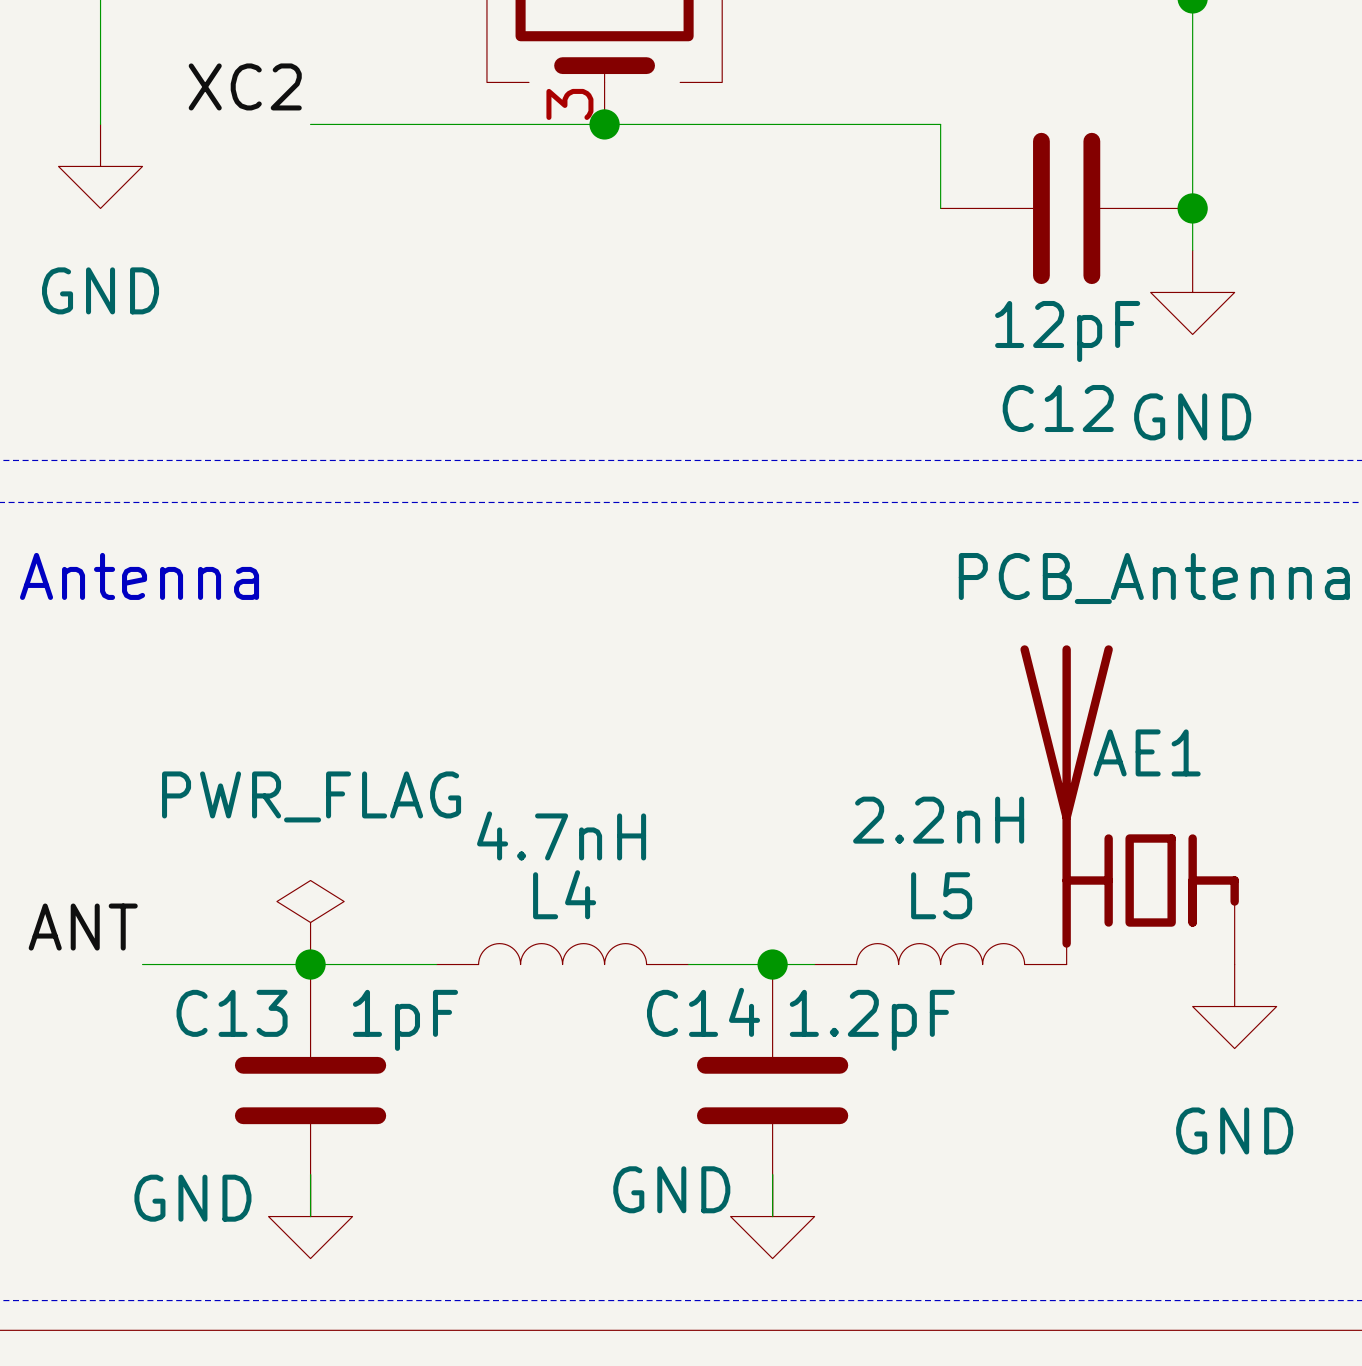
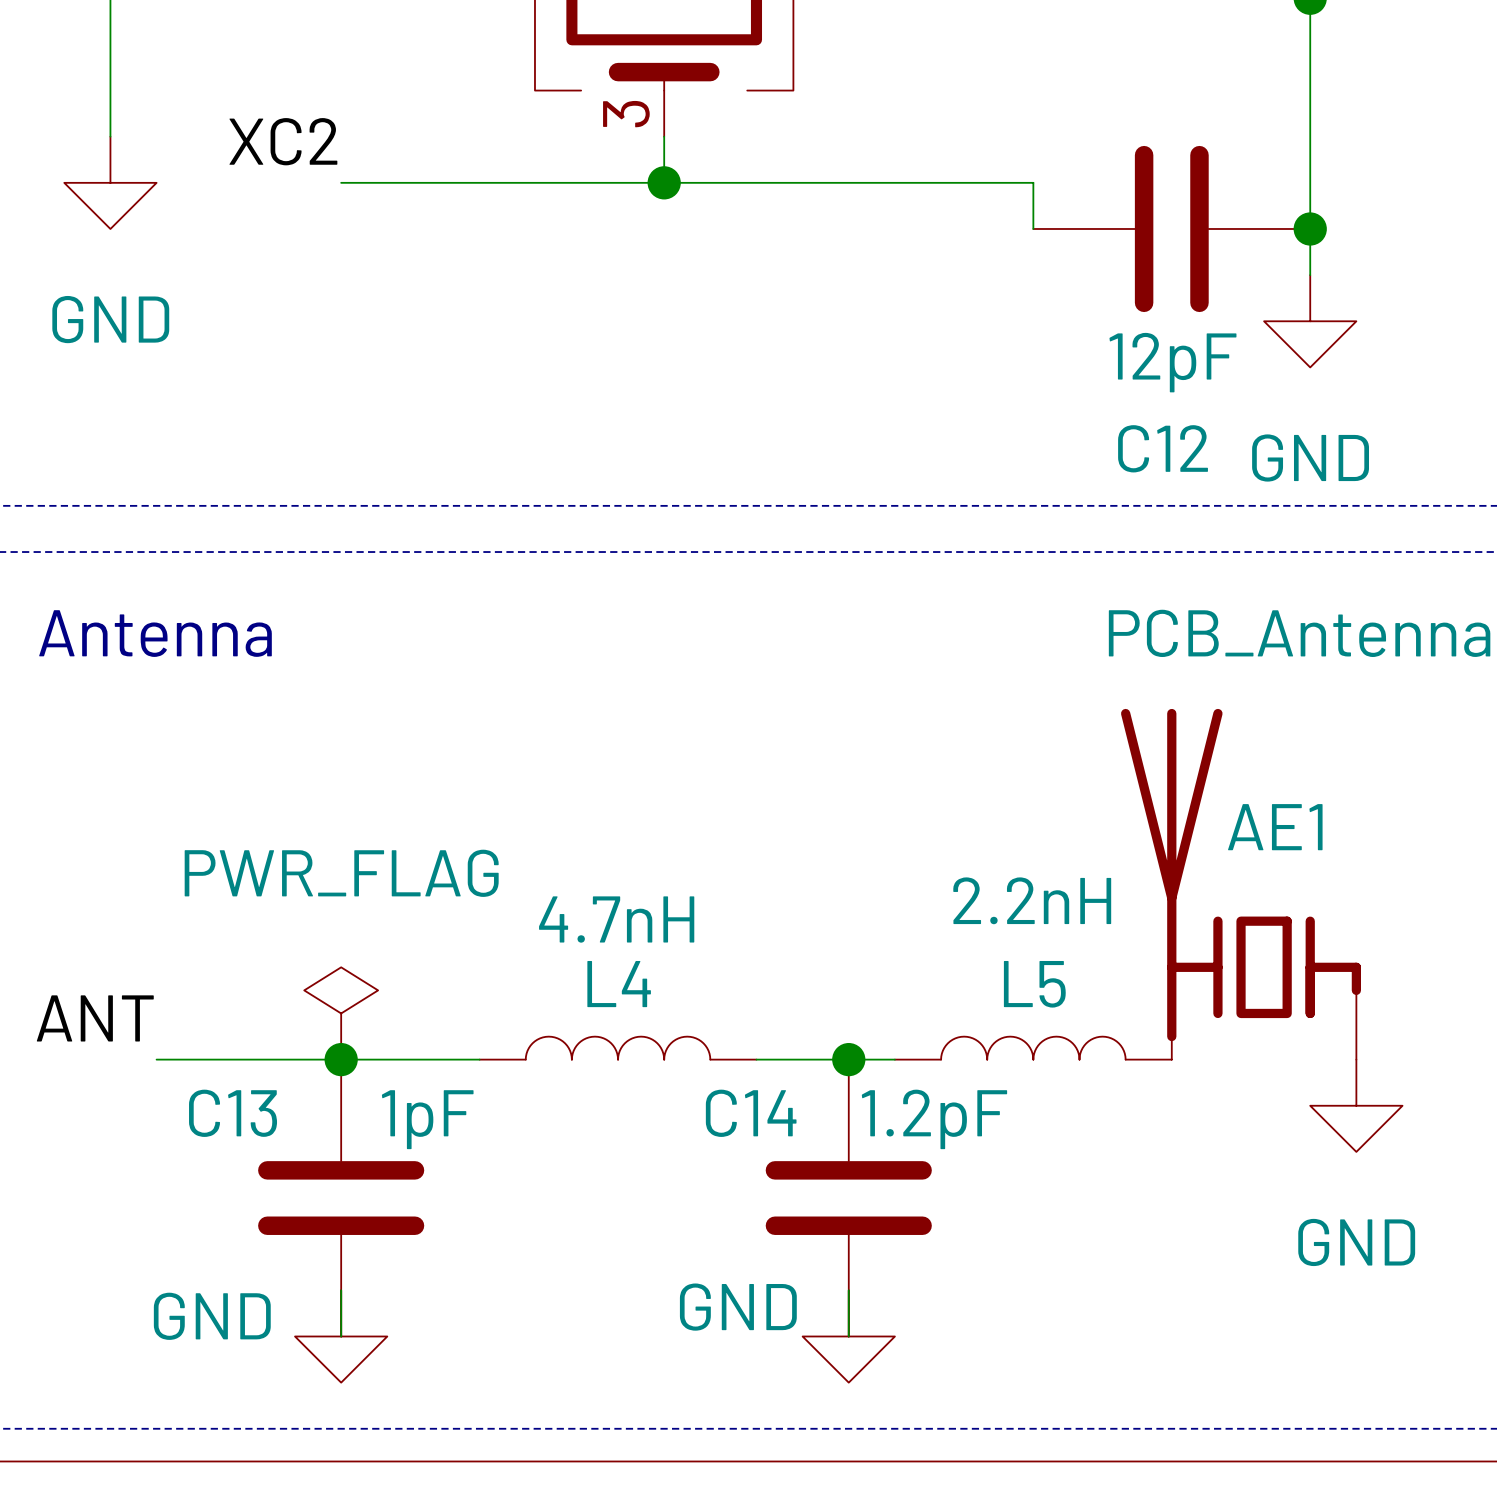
label position: XC2 (245, 86) -> XC2 (283, 141)
wire: (310, 124) (940, 124) (940, 166) -> (341, 182) (1033, 182)
wire: none -> (664, 136) (664, 182)
junction position: (604, 124) -> (664, 182)

